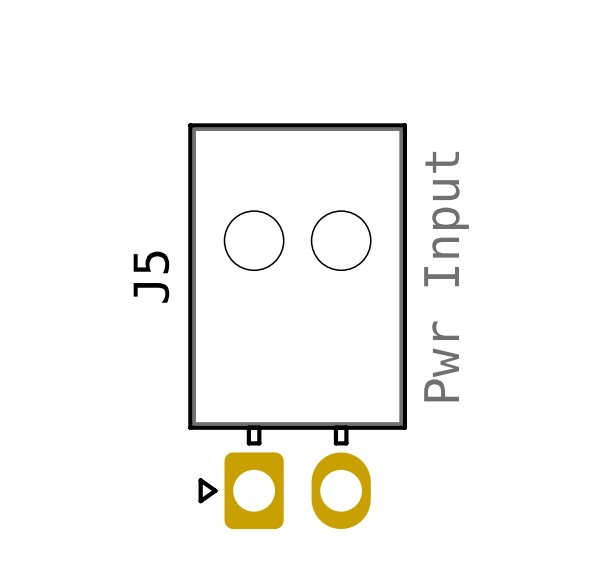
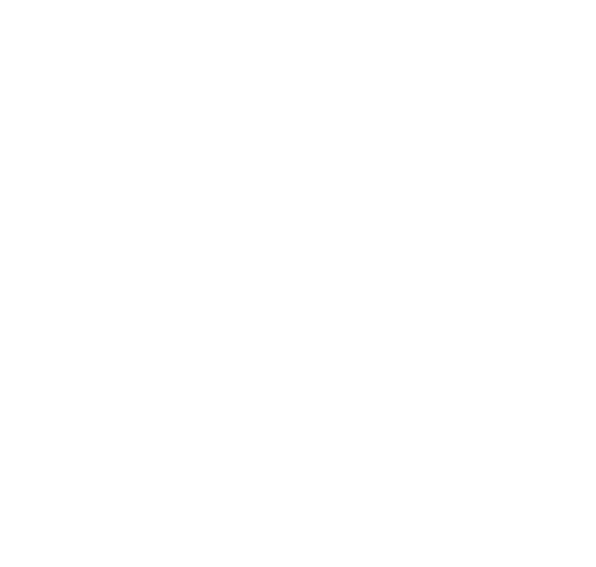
J5: Pwr Input (297, 326) -> none

